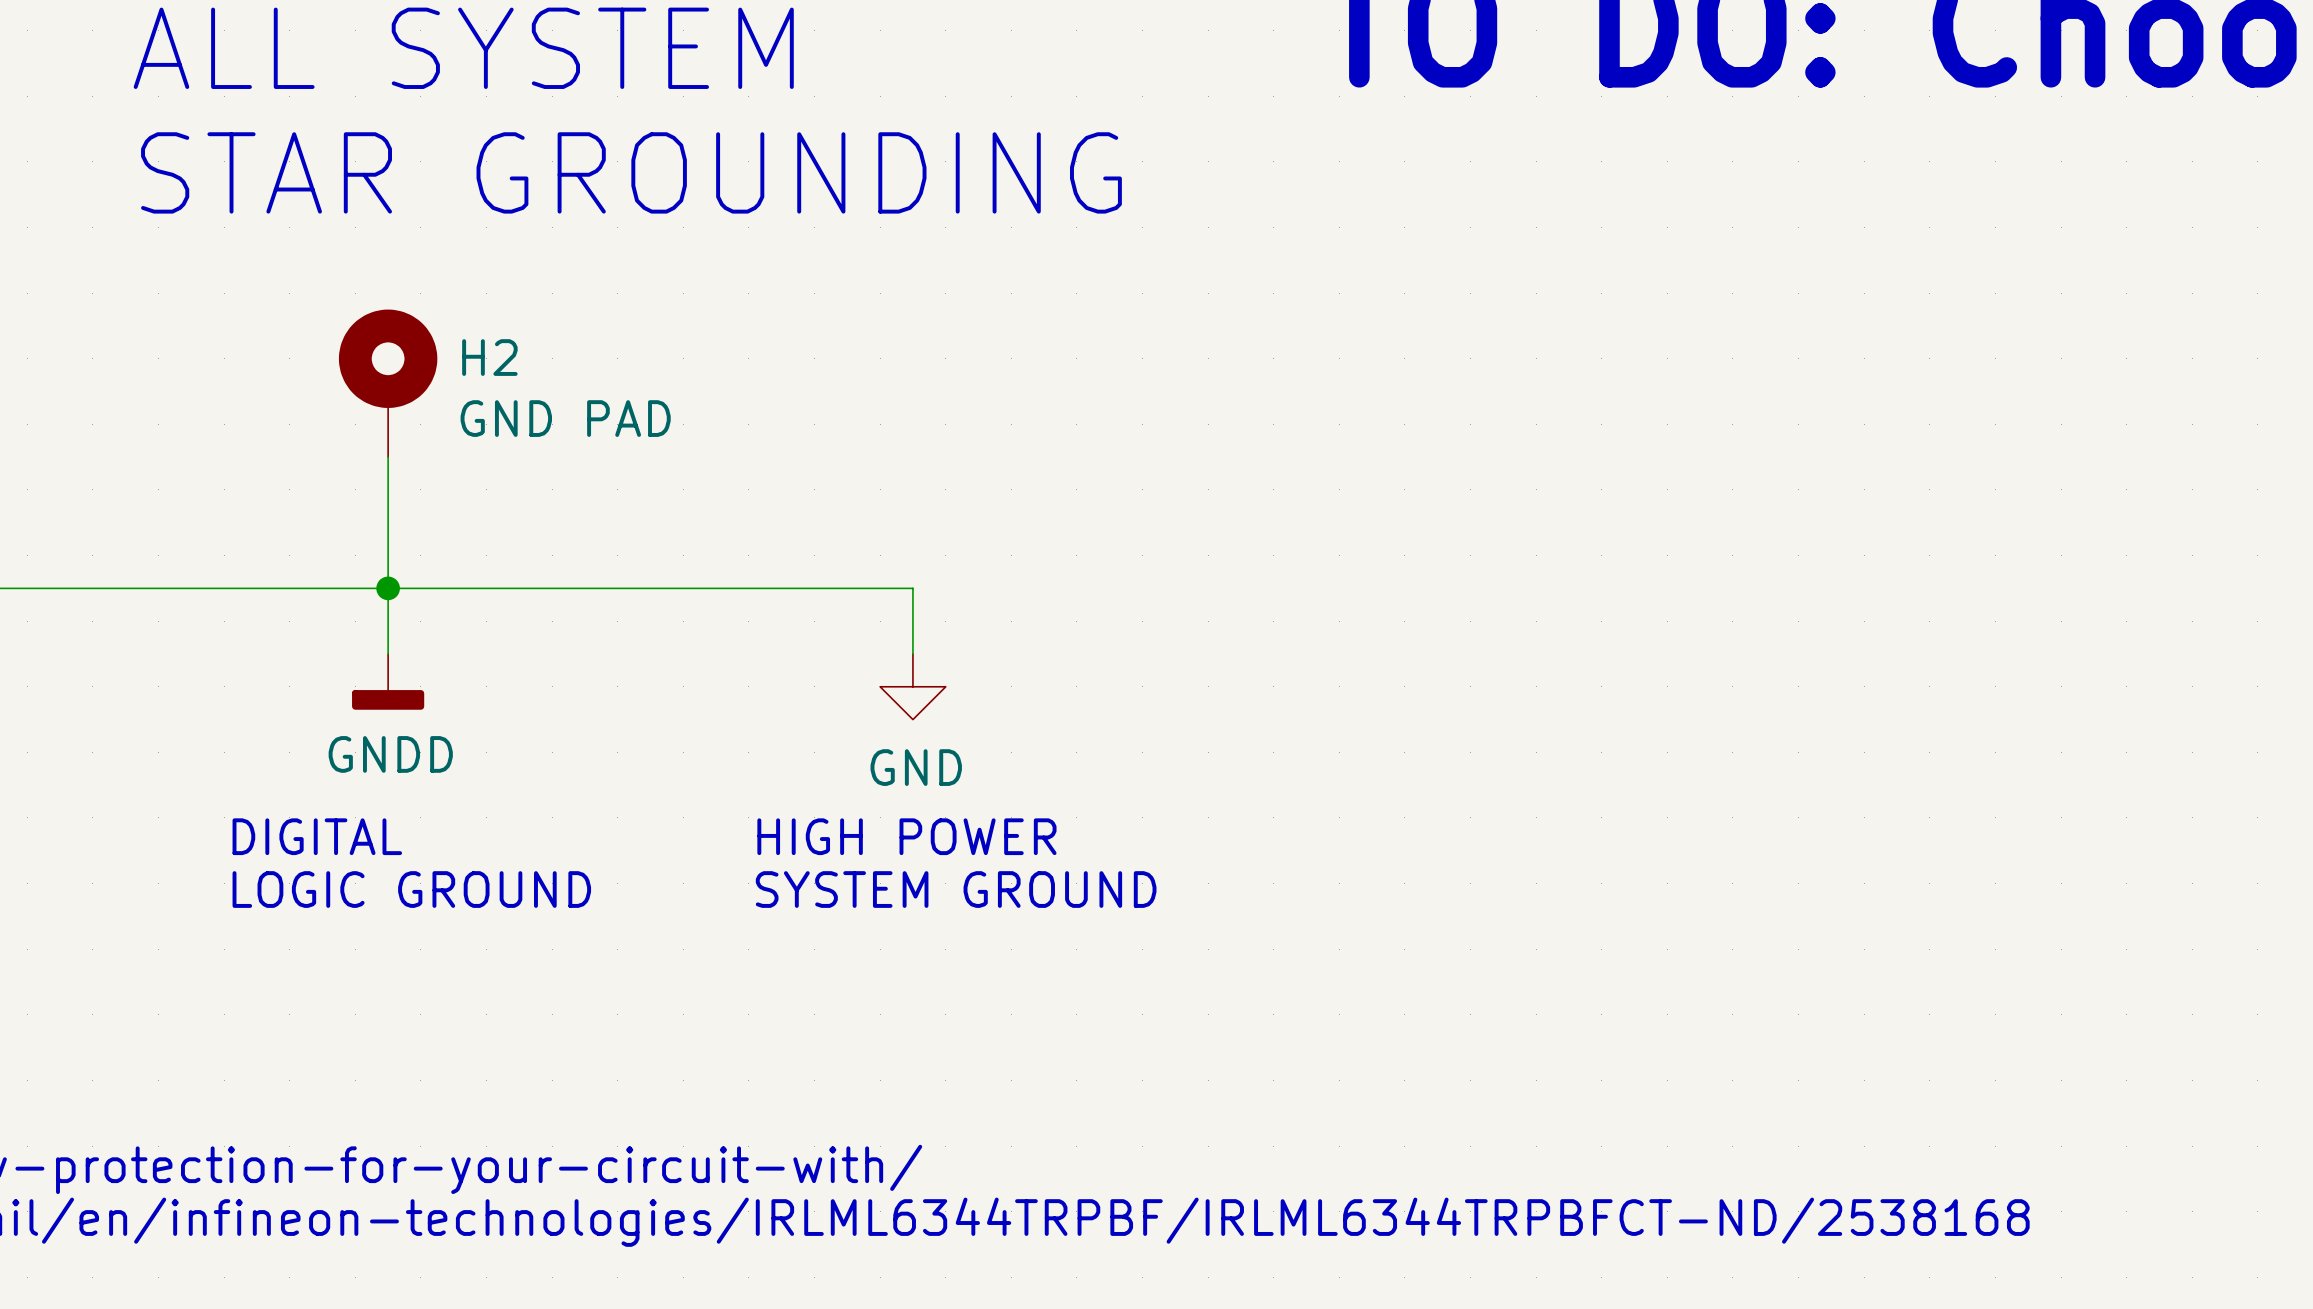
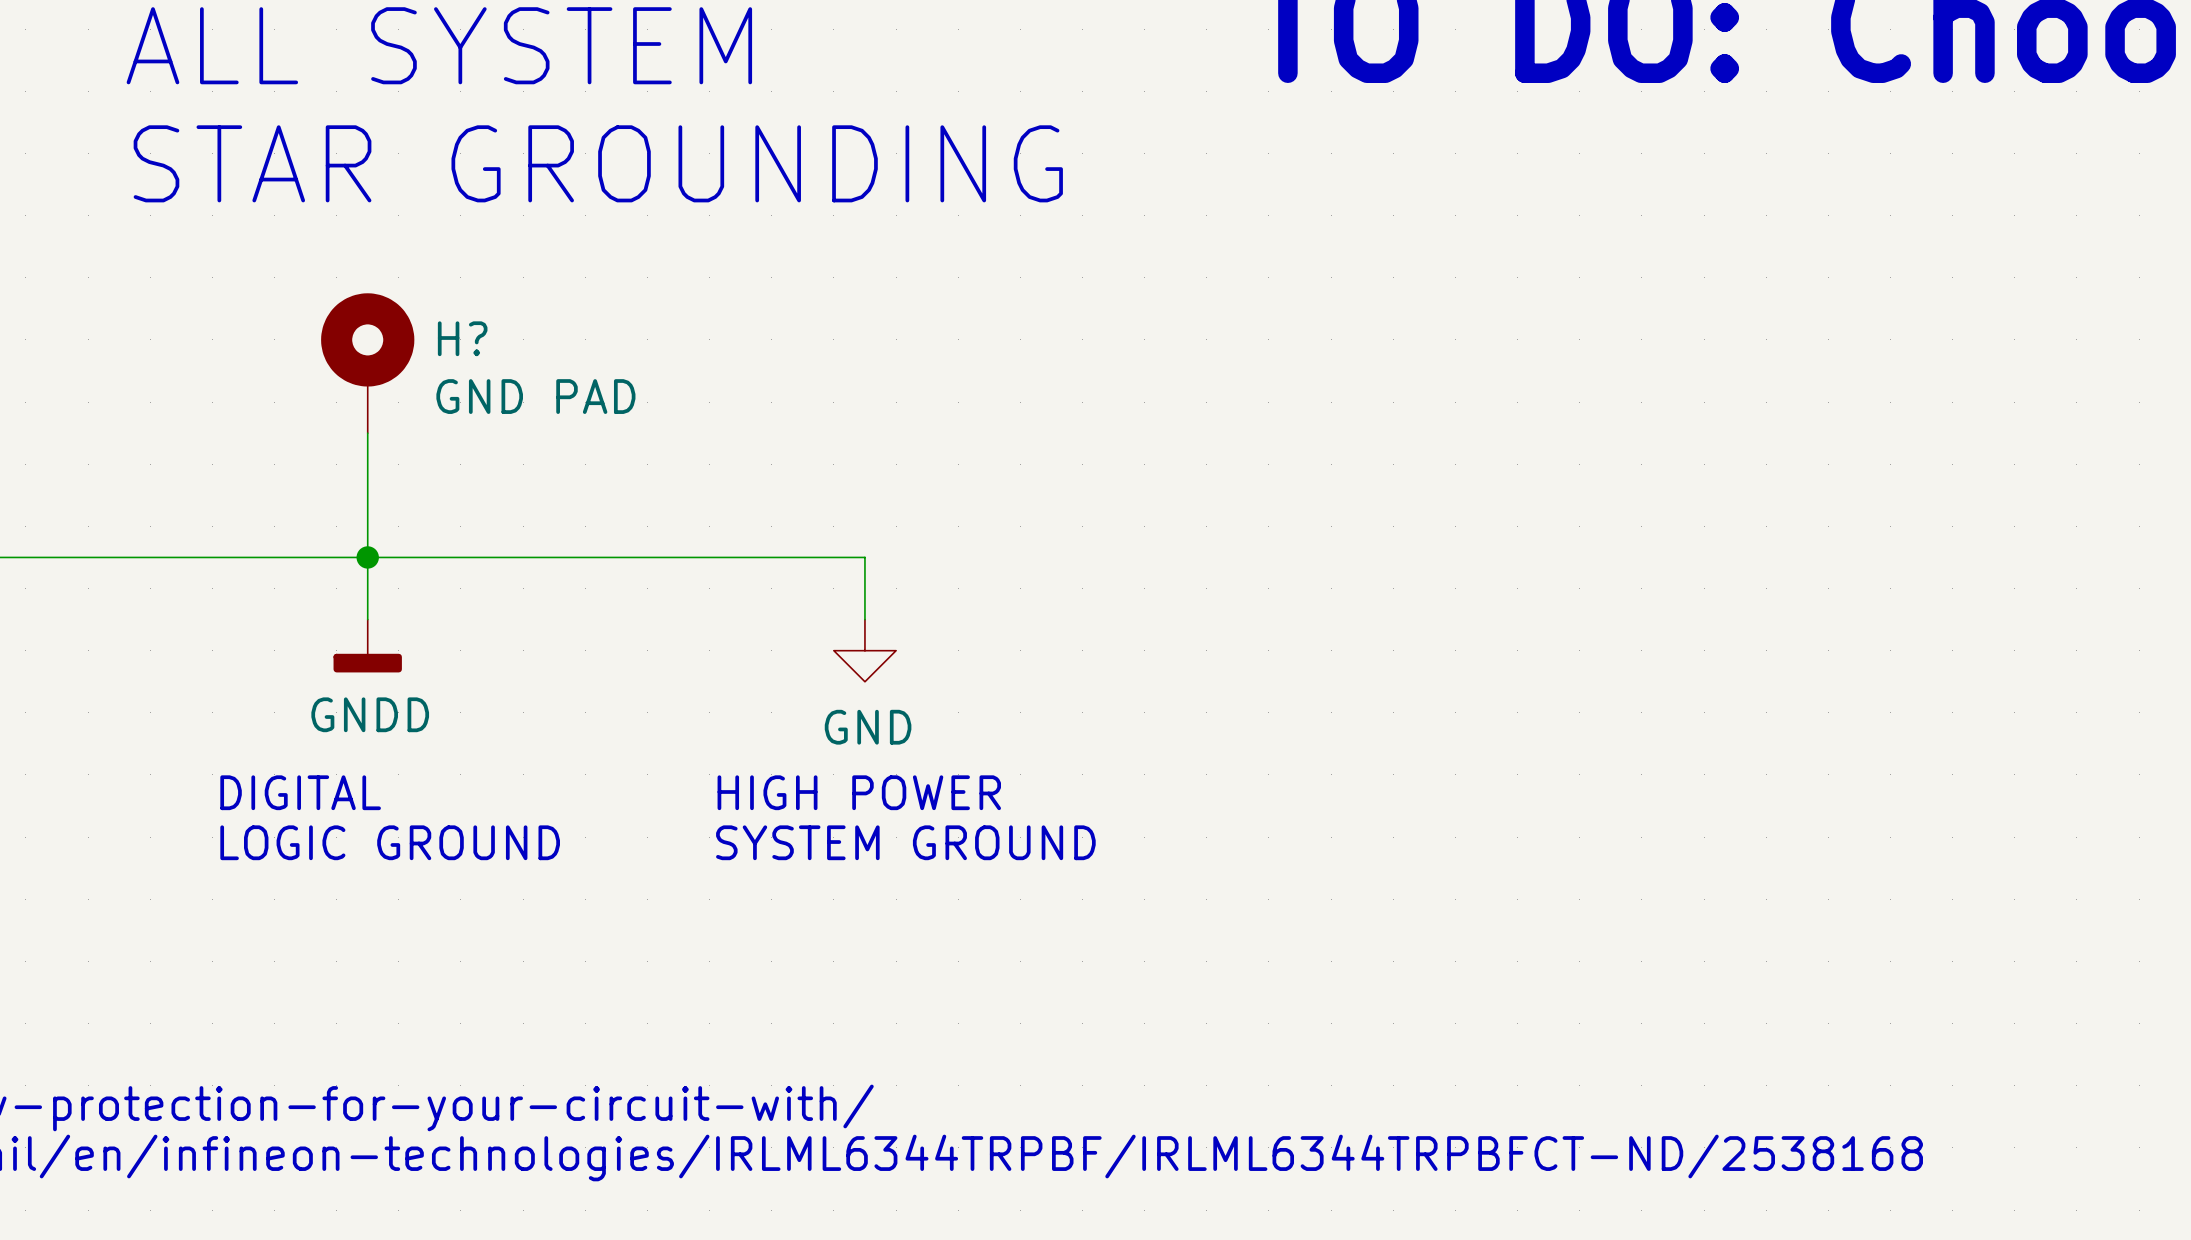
H2 name: H2 (489, 357) -> H? (462, 338)

